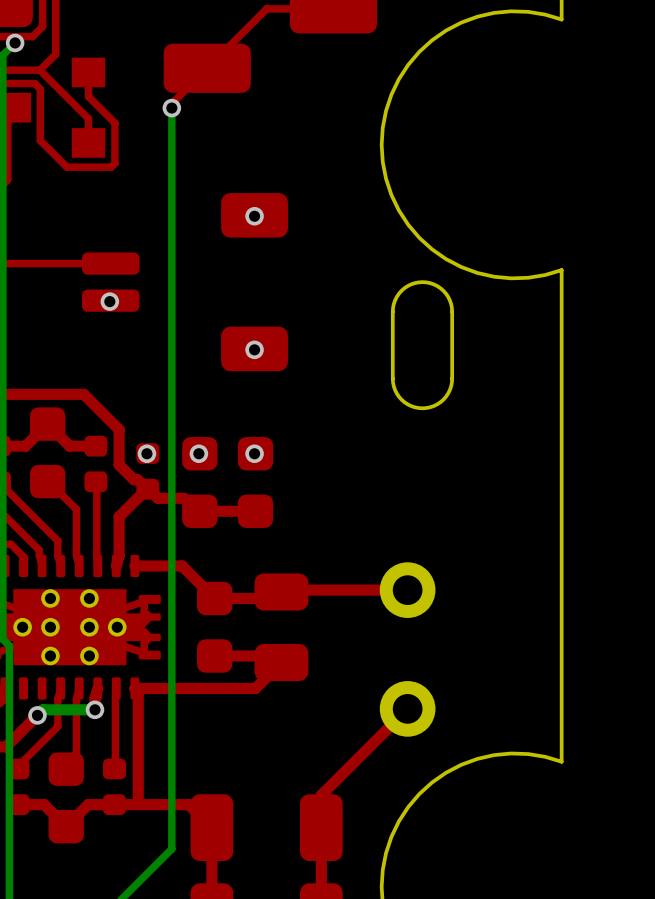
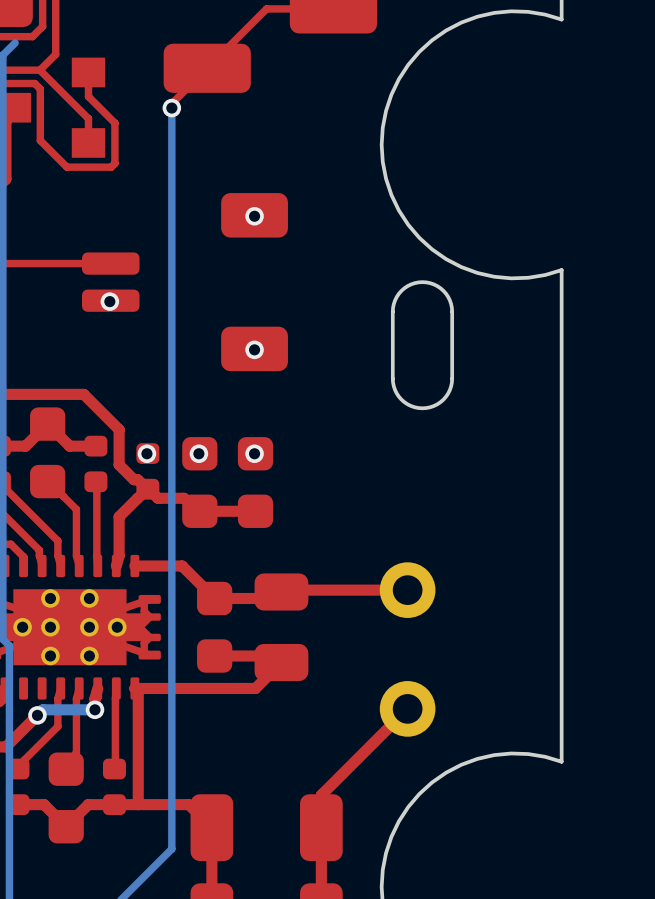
via: (15, 42) -> none

